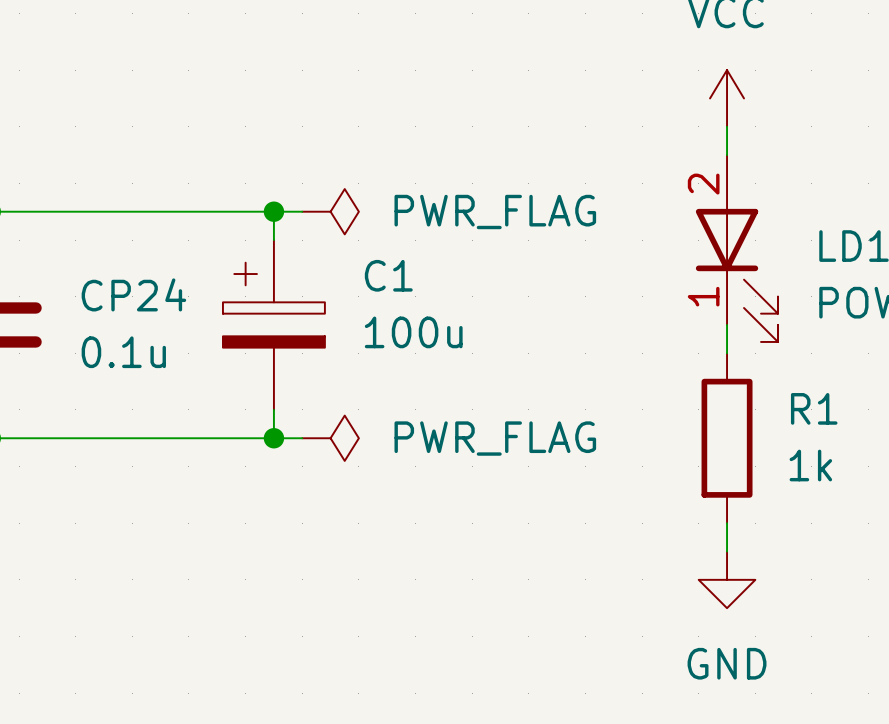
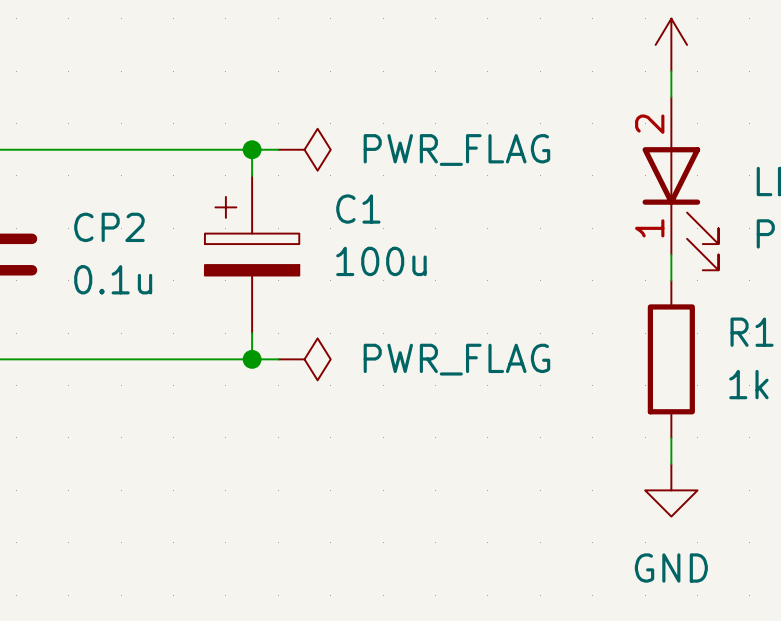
CP24 name: CP24 (133, 294) -> CP2 (109, 227)

